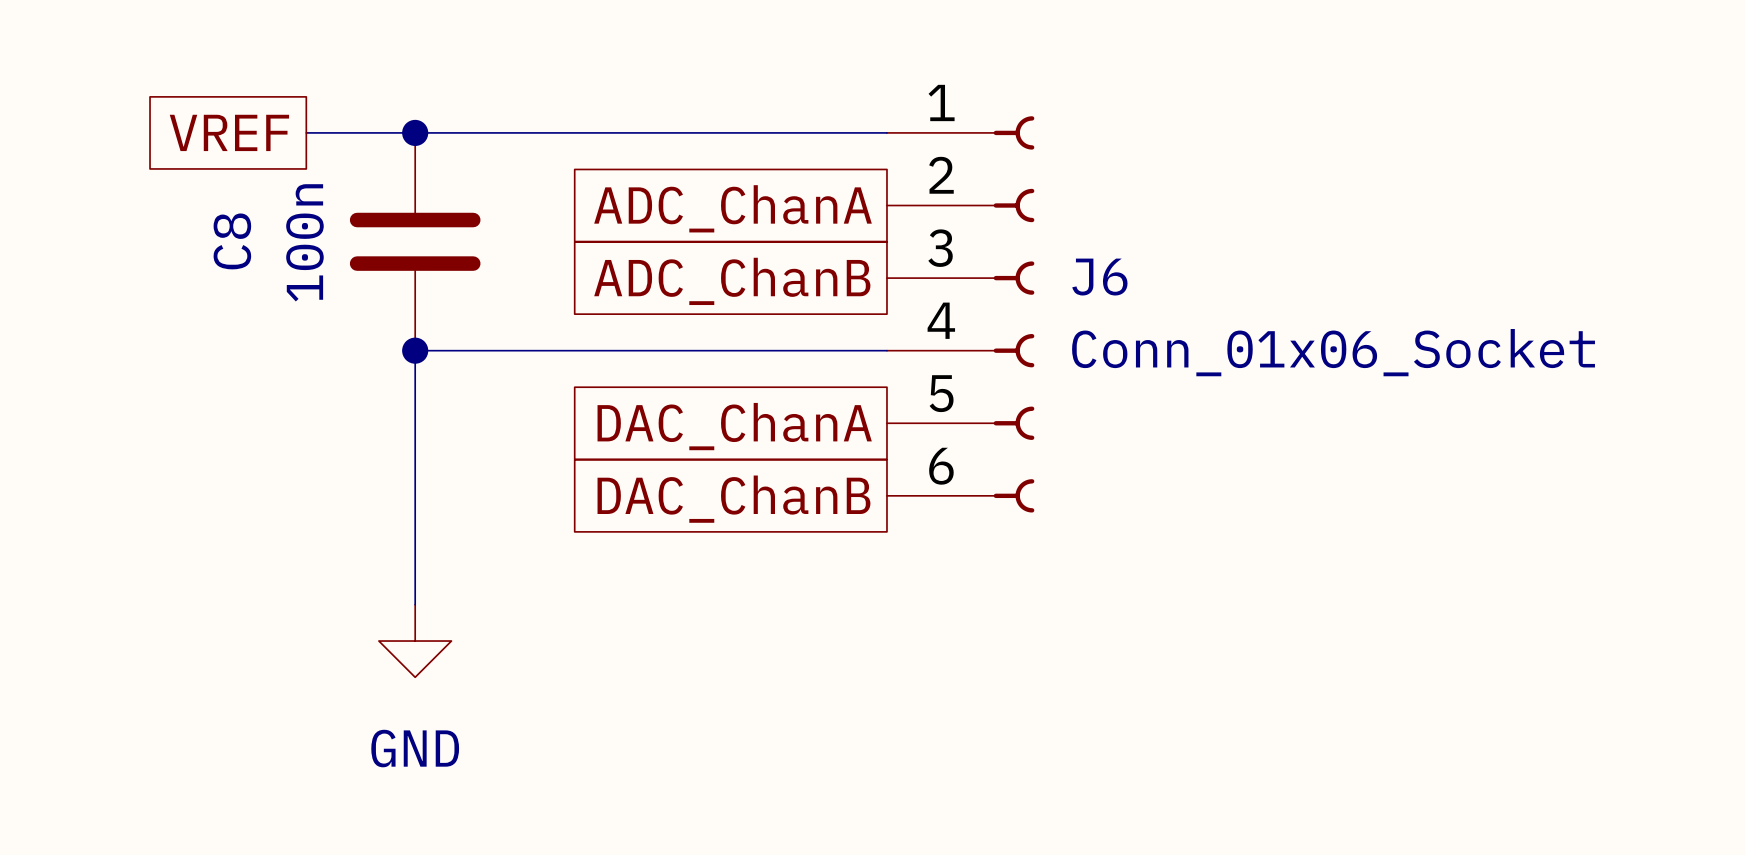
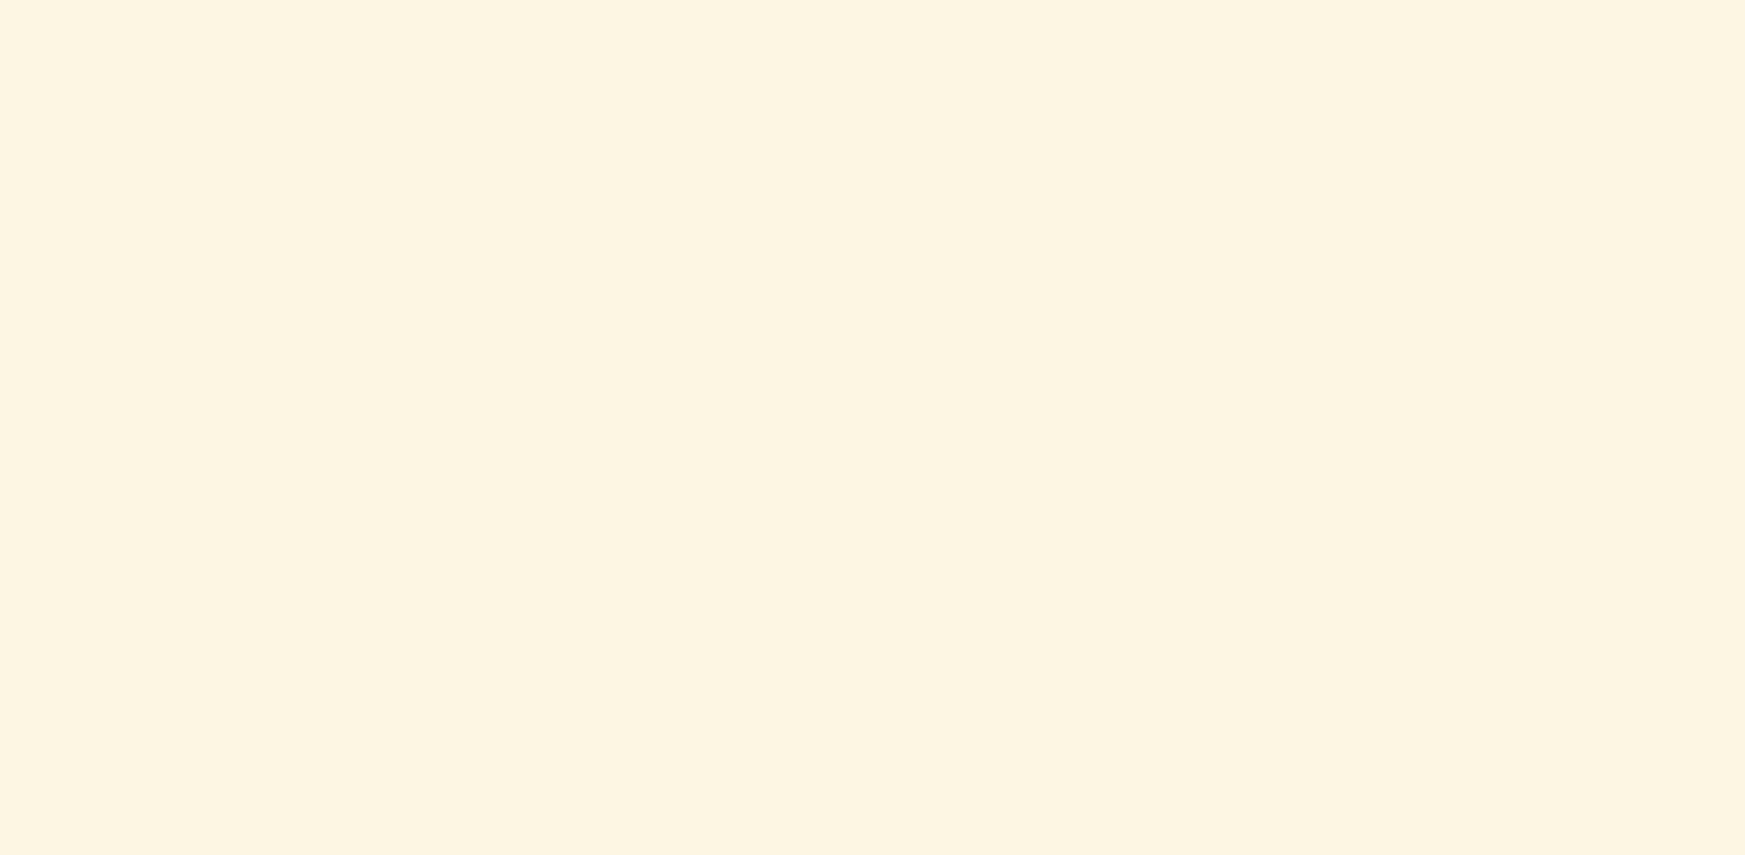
global label: VREF (229, 132) -> none
wire: (306, 132) (886, 132) -> none
junction: (415, 132) -> none
global label: ADC_ChanA (733, 208) -> none
C8: 100n (415, 241) -> none
global label: ADC_ChanB (732, 281) -> none
J6: Conn_01x06_Socket (960, 314) -> none
junction: (415, 350) -> none
wire: (886, 350) (415, 350) (415, 604) -> none
global label: DAC_ChanA (734, 426) -> none
global label: DAC_ChanB (733, 499) -> none
power symbol: GND (415, 641) -> none

